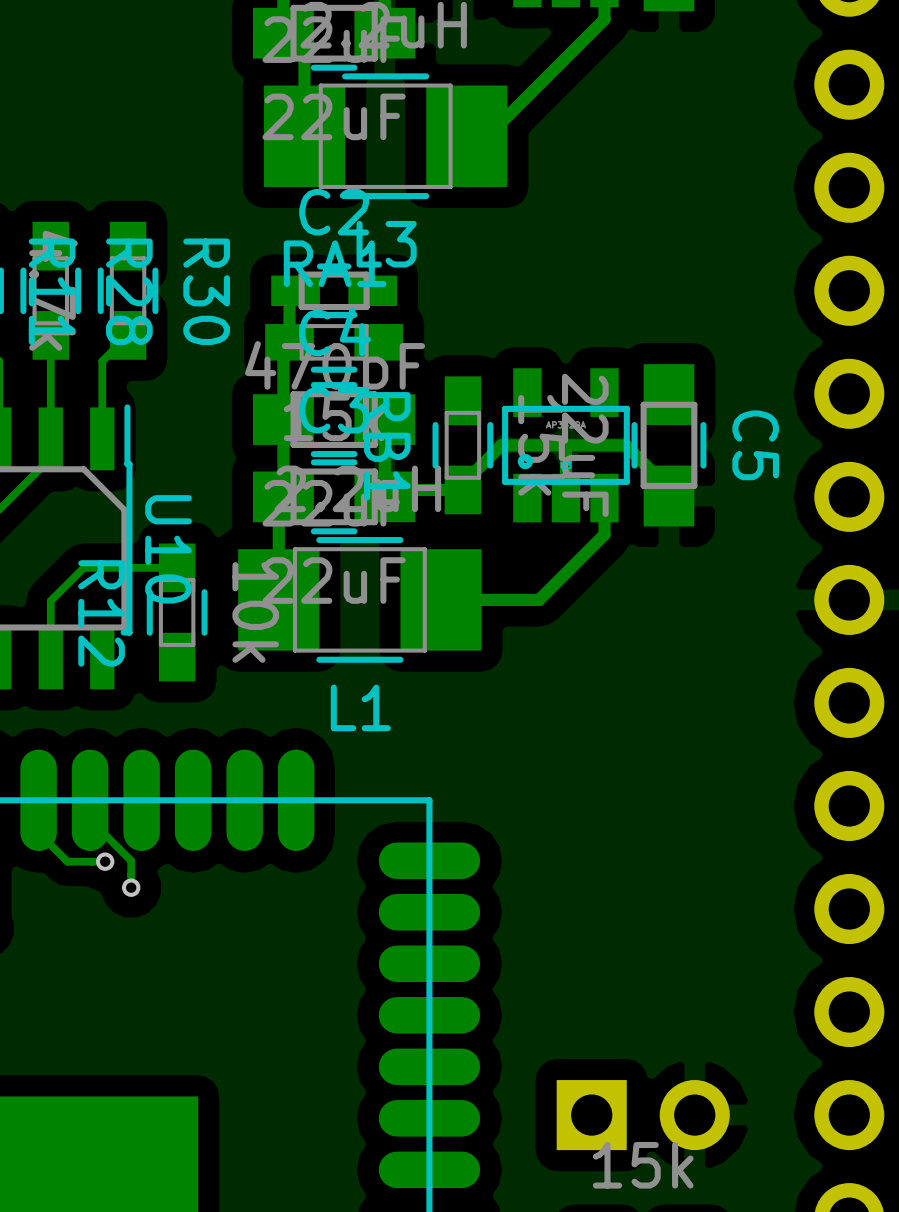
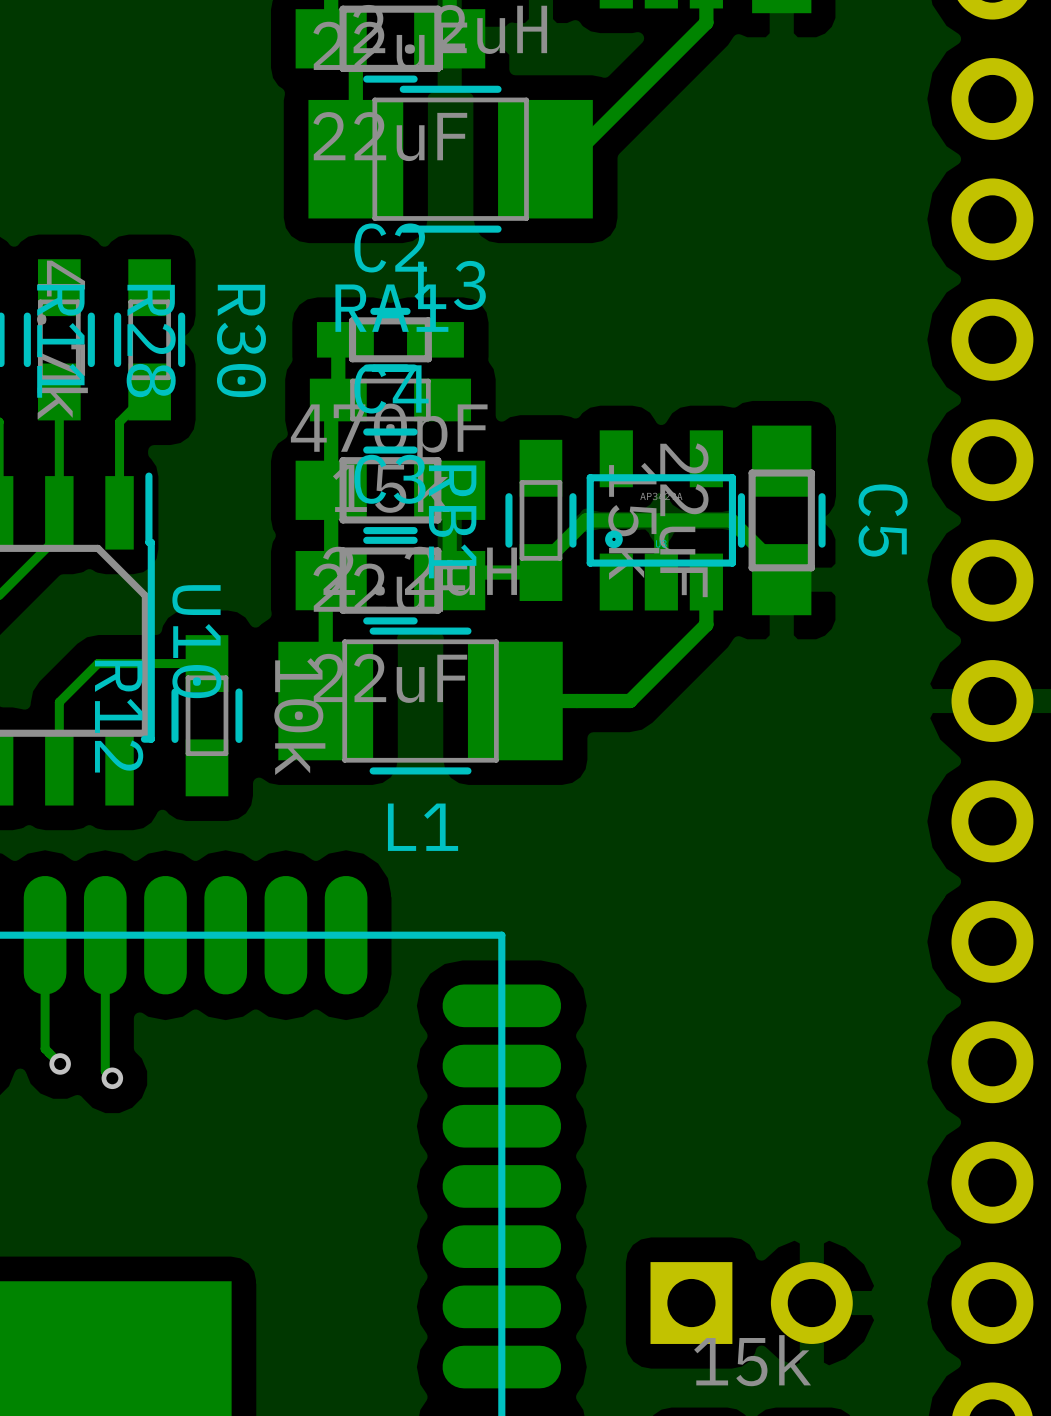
track: (90, 819) (131, 860) (131, 887) -> (105, 957) (105, 1071) (112, 1078)
track: (38, 832) (67, 861) (105, 861) -> (45, 973) (45, 1048) (60, 1063)
via: (105, 861) -> none
via: (131, 887) -> none
via: none -> (60, 1063)
via: none -> (112, 1078)

